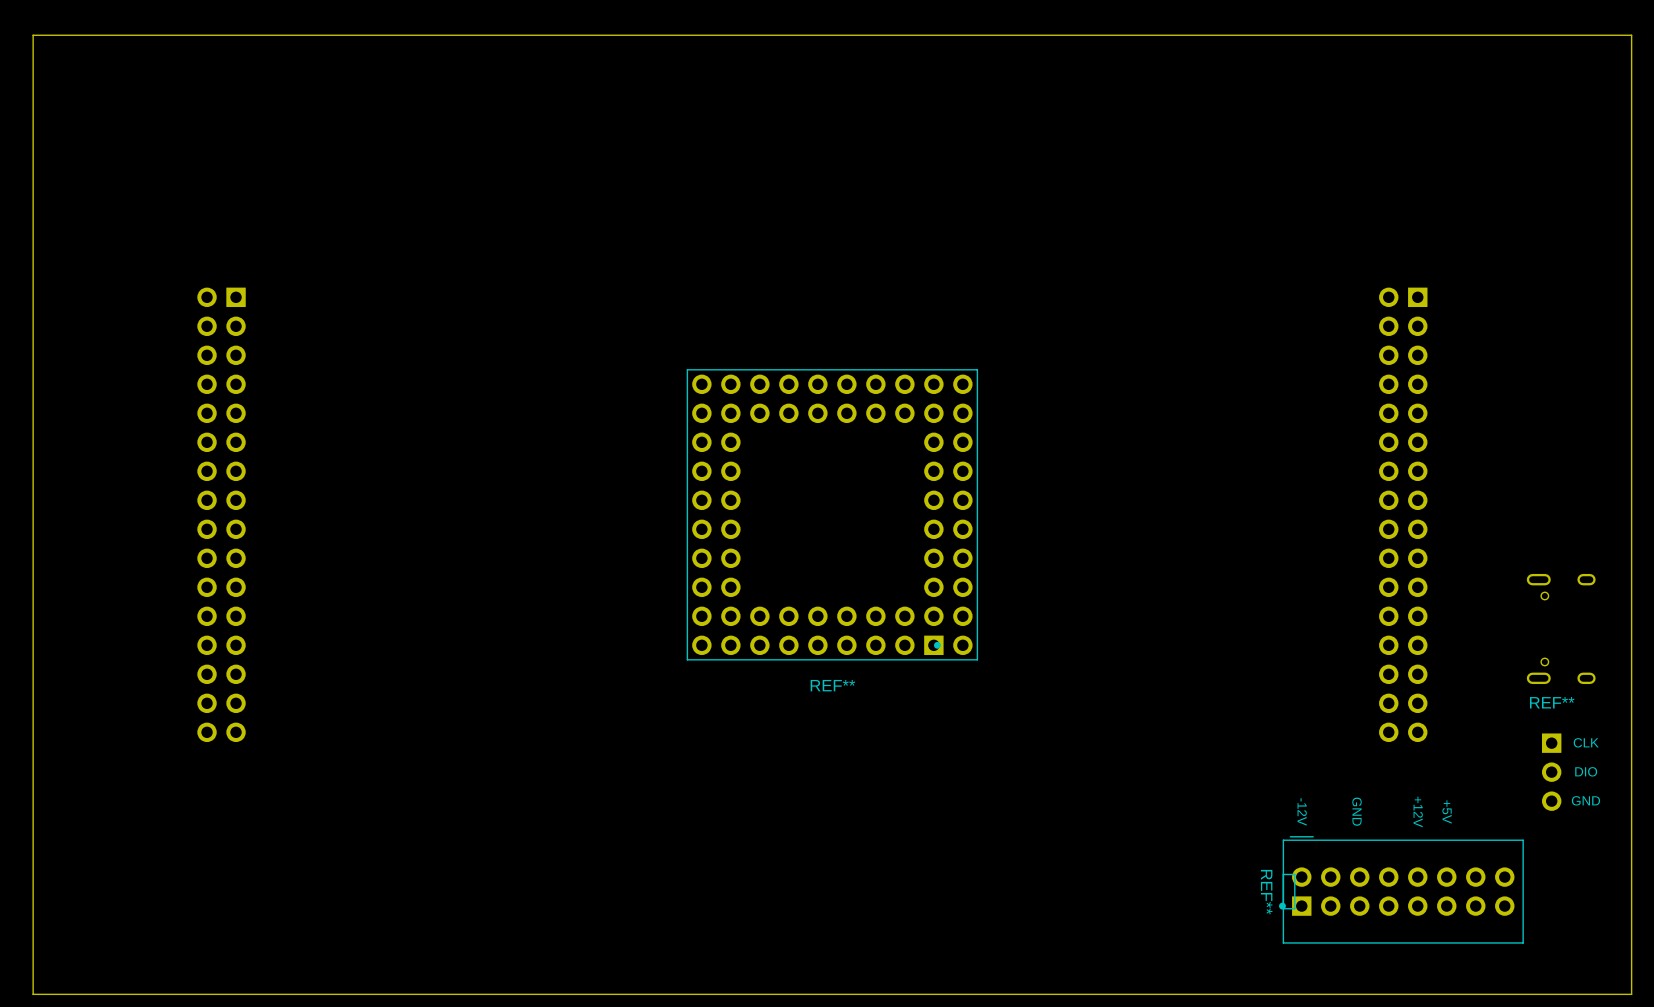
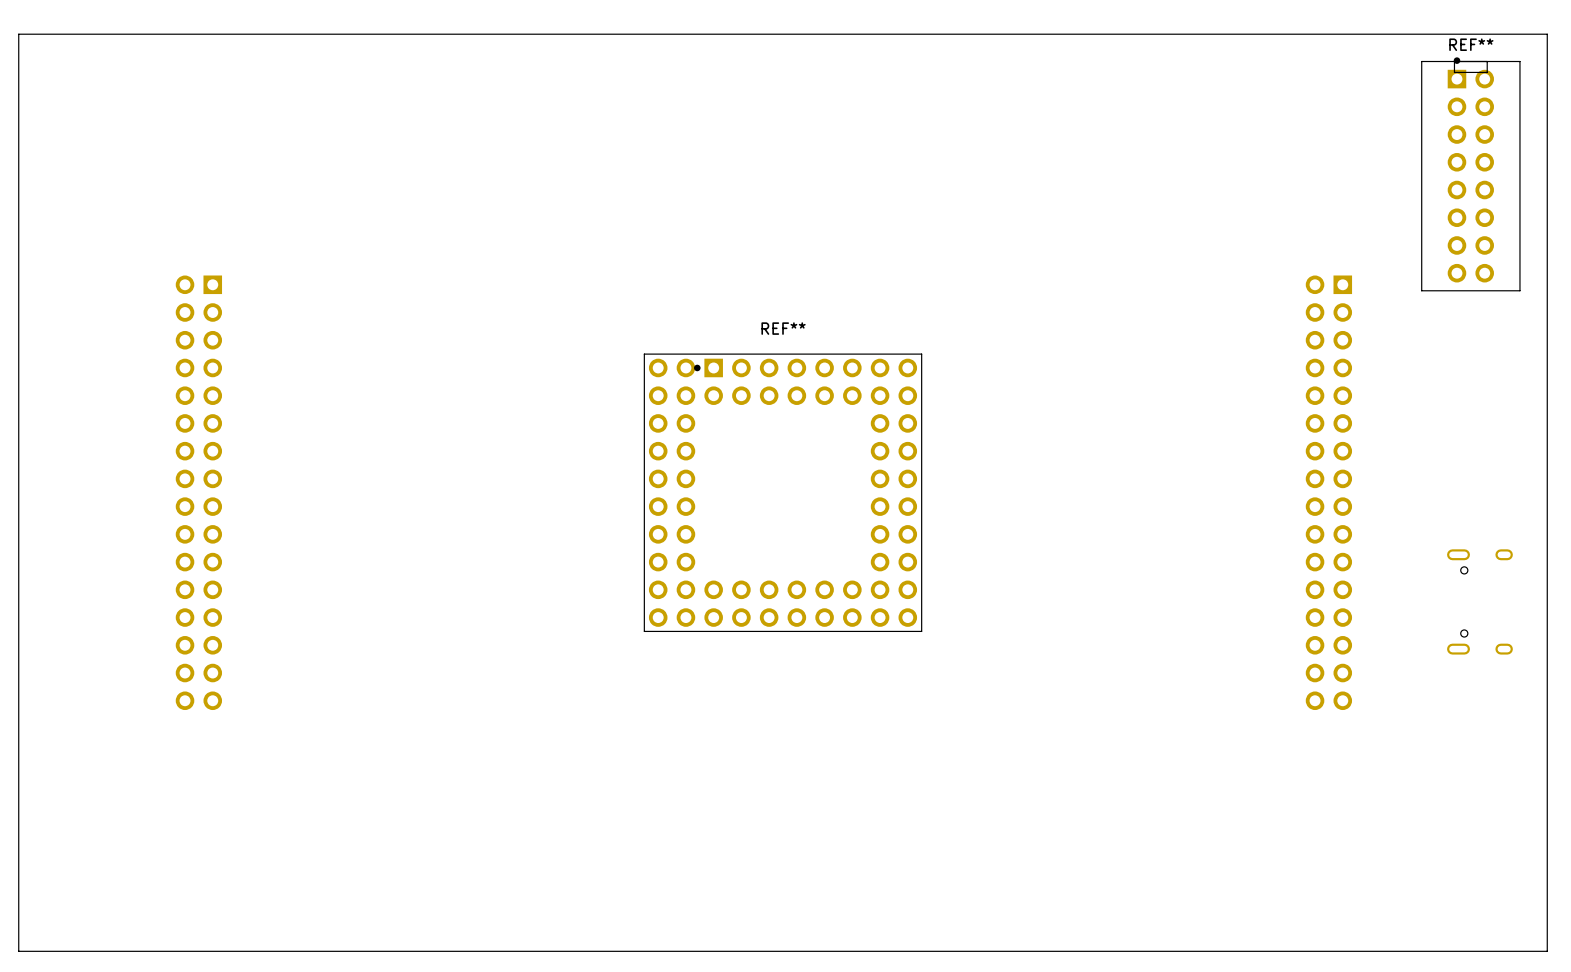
REF**: none -> (1470, 174)
REF** footprint: [686, 369, 978, 661] -> [643, 353, 923, 632]
REF** name position: REF** (832, 685) -> REF** (783, 328)
REF**: (1551, 772) -> none
REF**: (1401, 889) -> none

